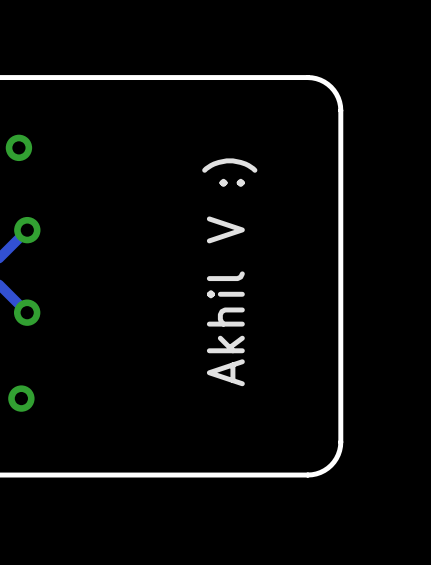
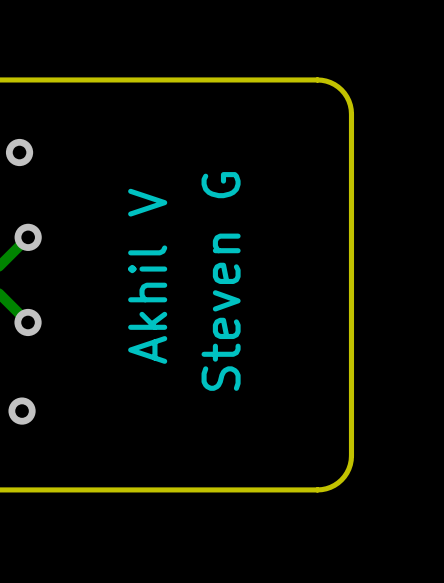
text: none -> Akhil V (147, 276)
text: Akhil V :) (229, 272) -> Steven G (221, 281)

